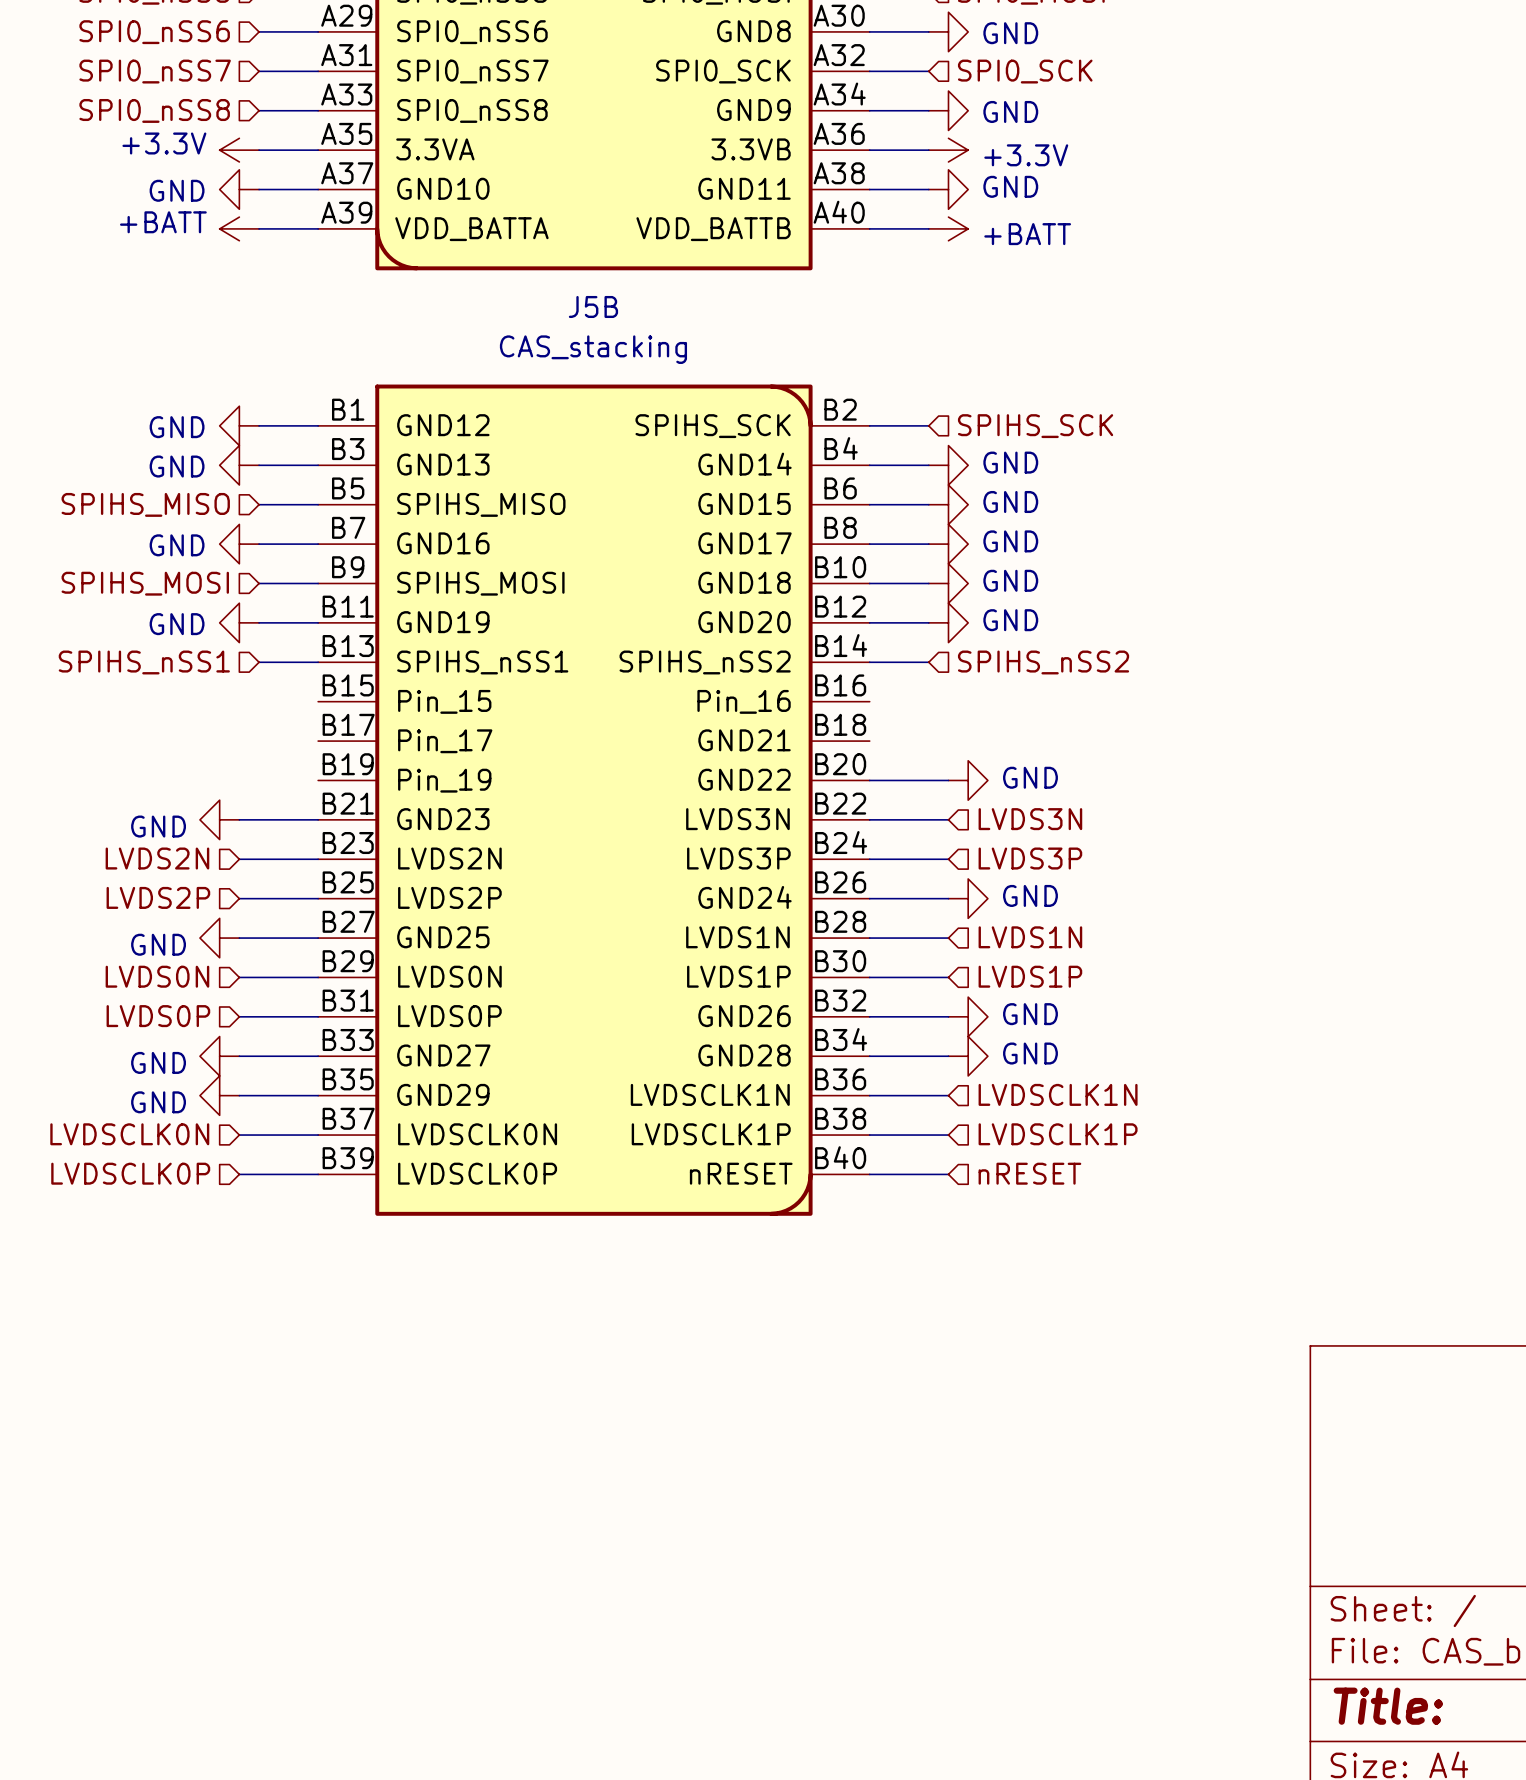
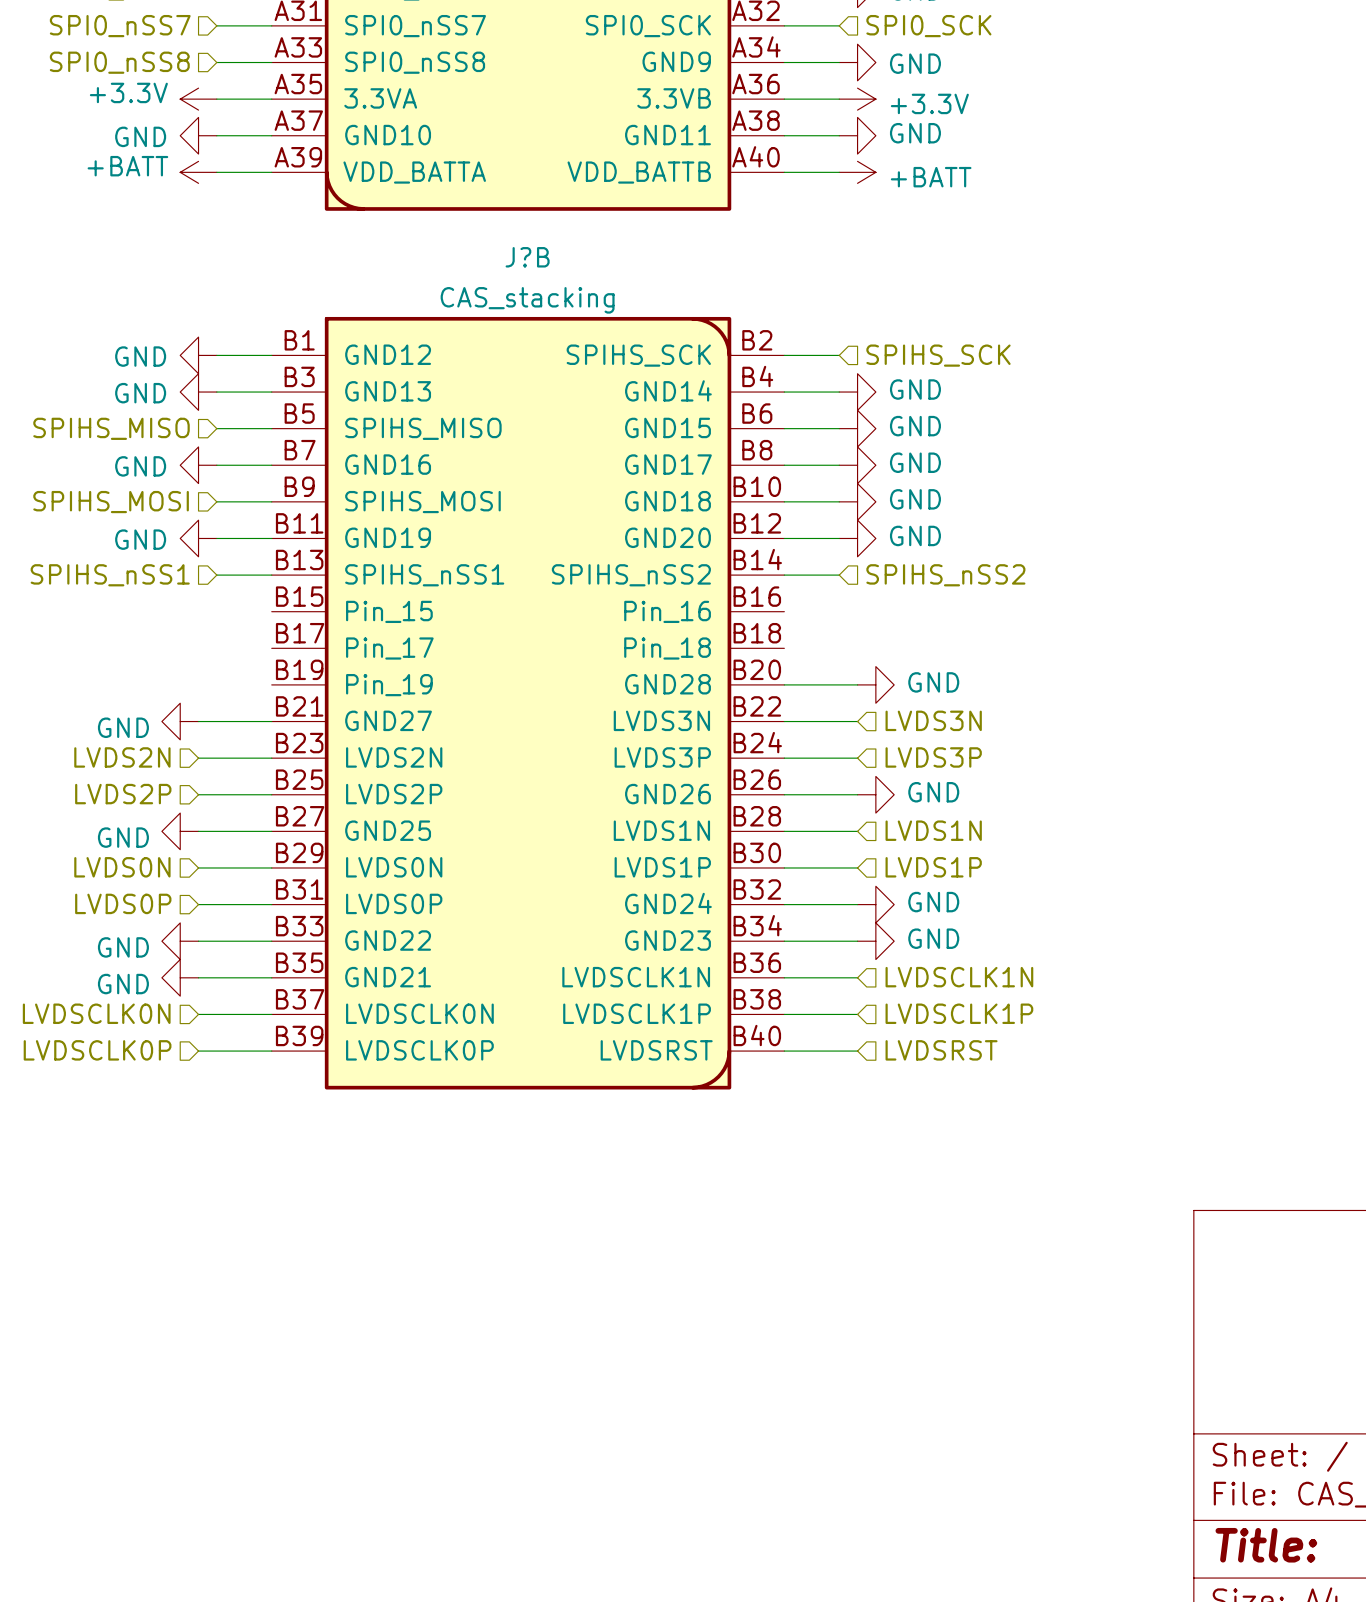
J5B name: J5B (593, 306) -> J?B (527, 257)
J5B symbol: [318, 384, 870, 1216] -> [271, 316, 785, 1090]
hierarchical label: nRESET (1029, 1173) -> LVDSRST (941, 1050)

